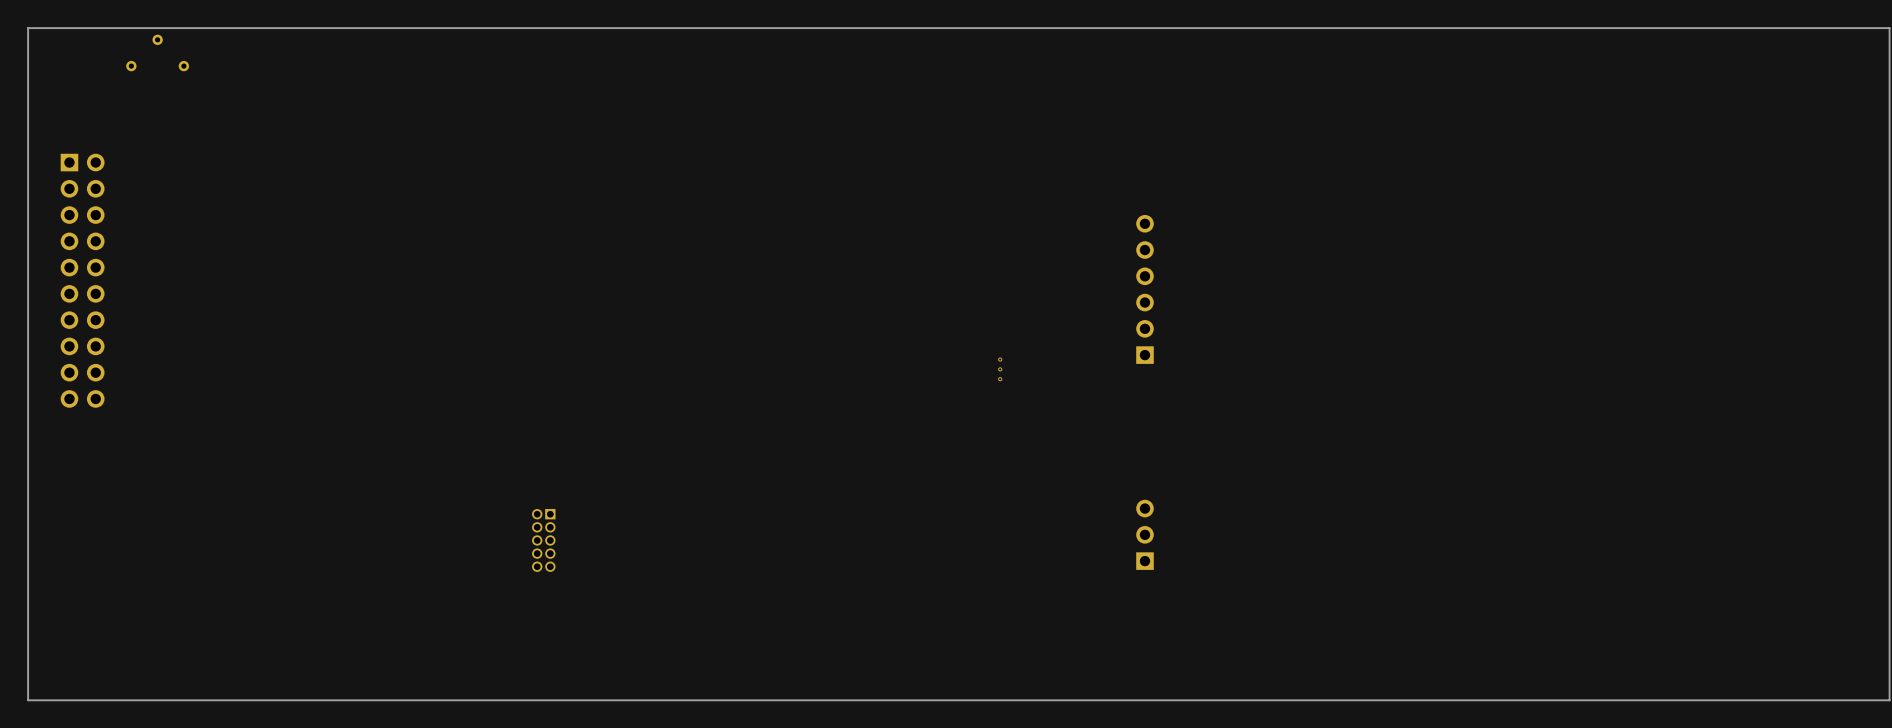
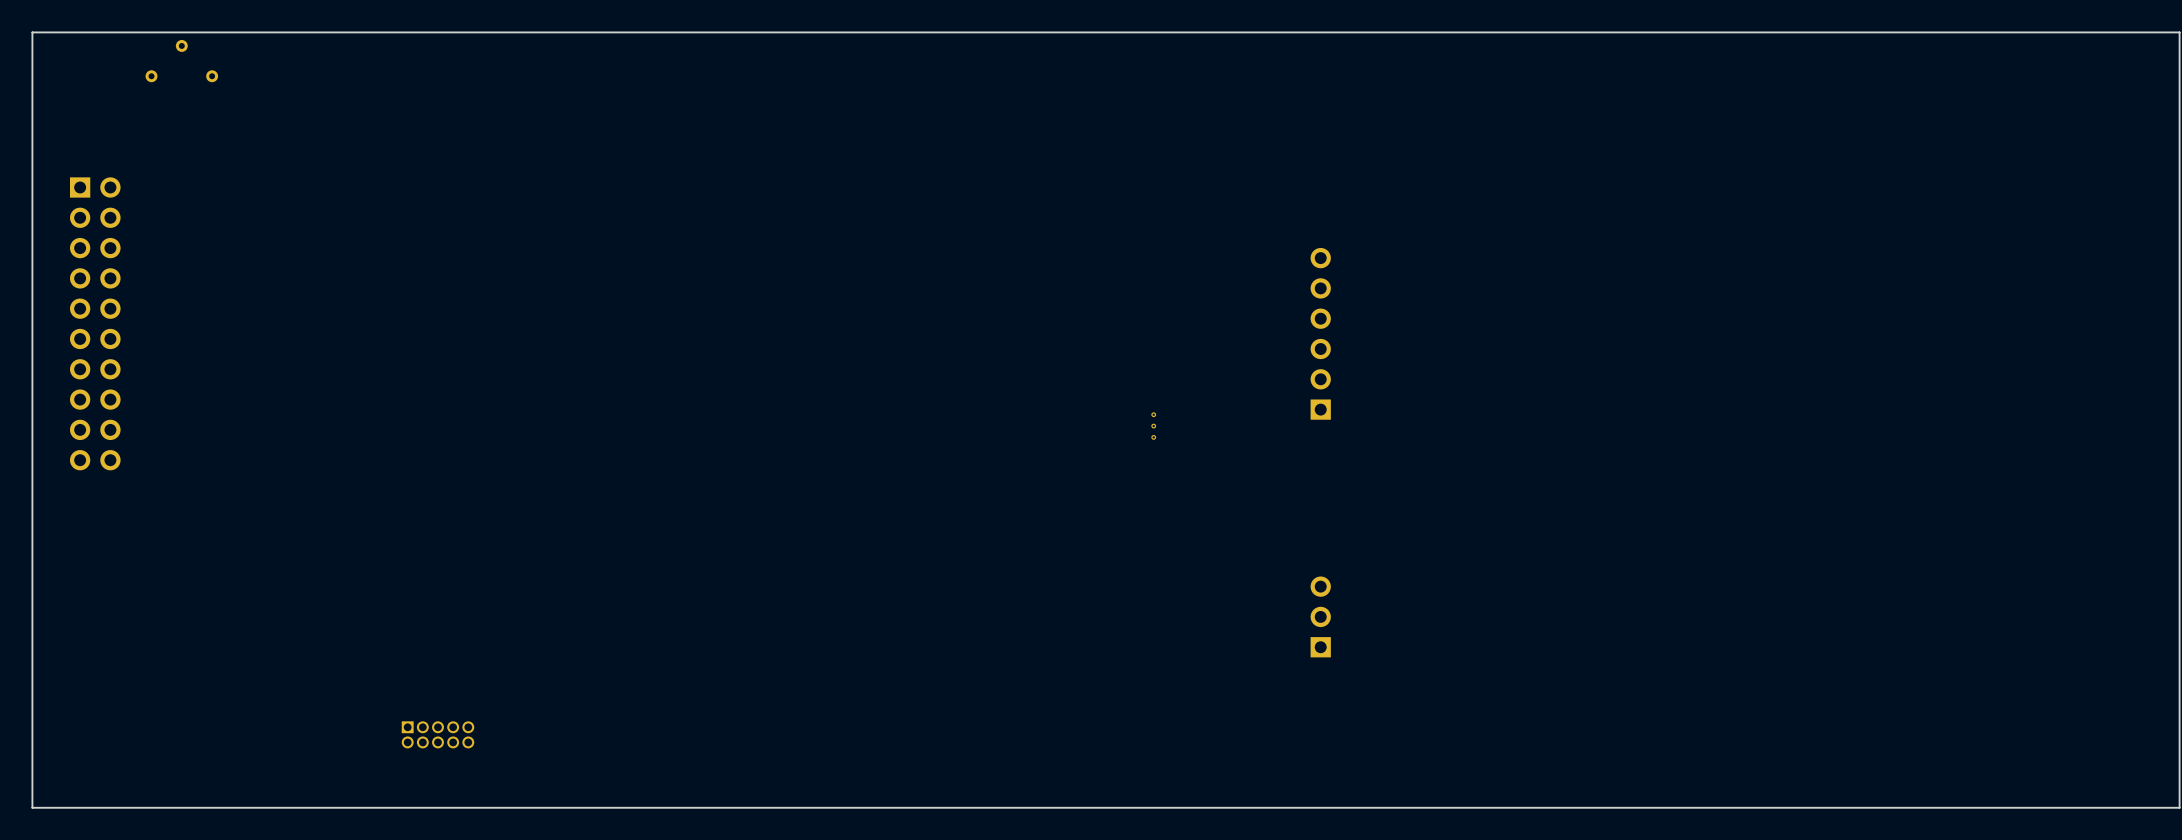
part rotation: 0° (543, 540) -> 90° counterclockwise (437, 734)
part position: (543, 540) -> (437, 734)

